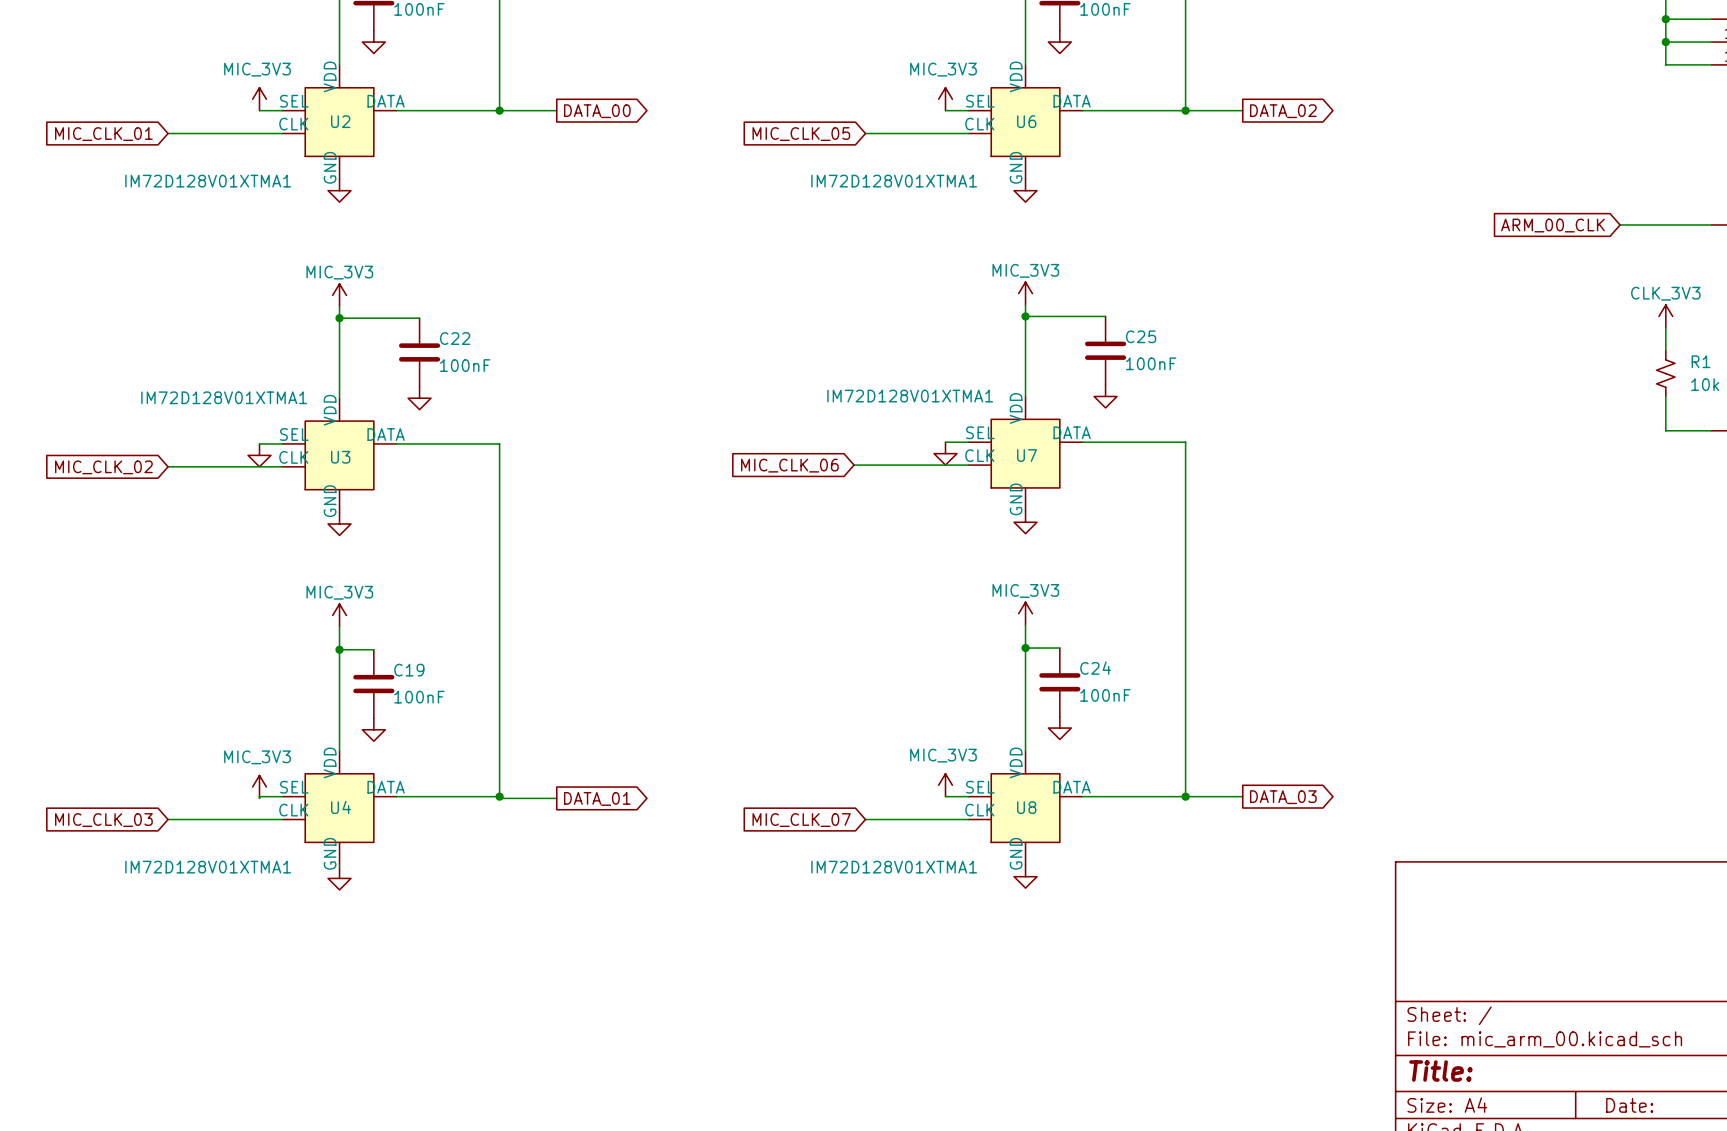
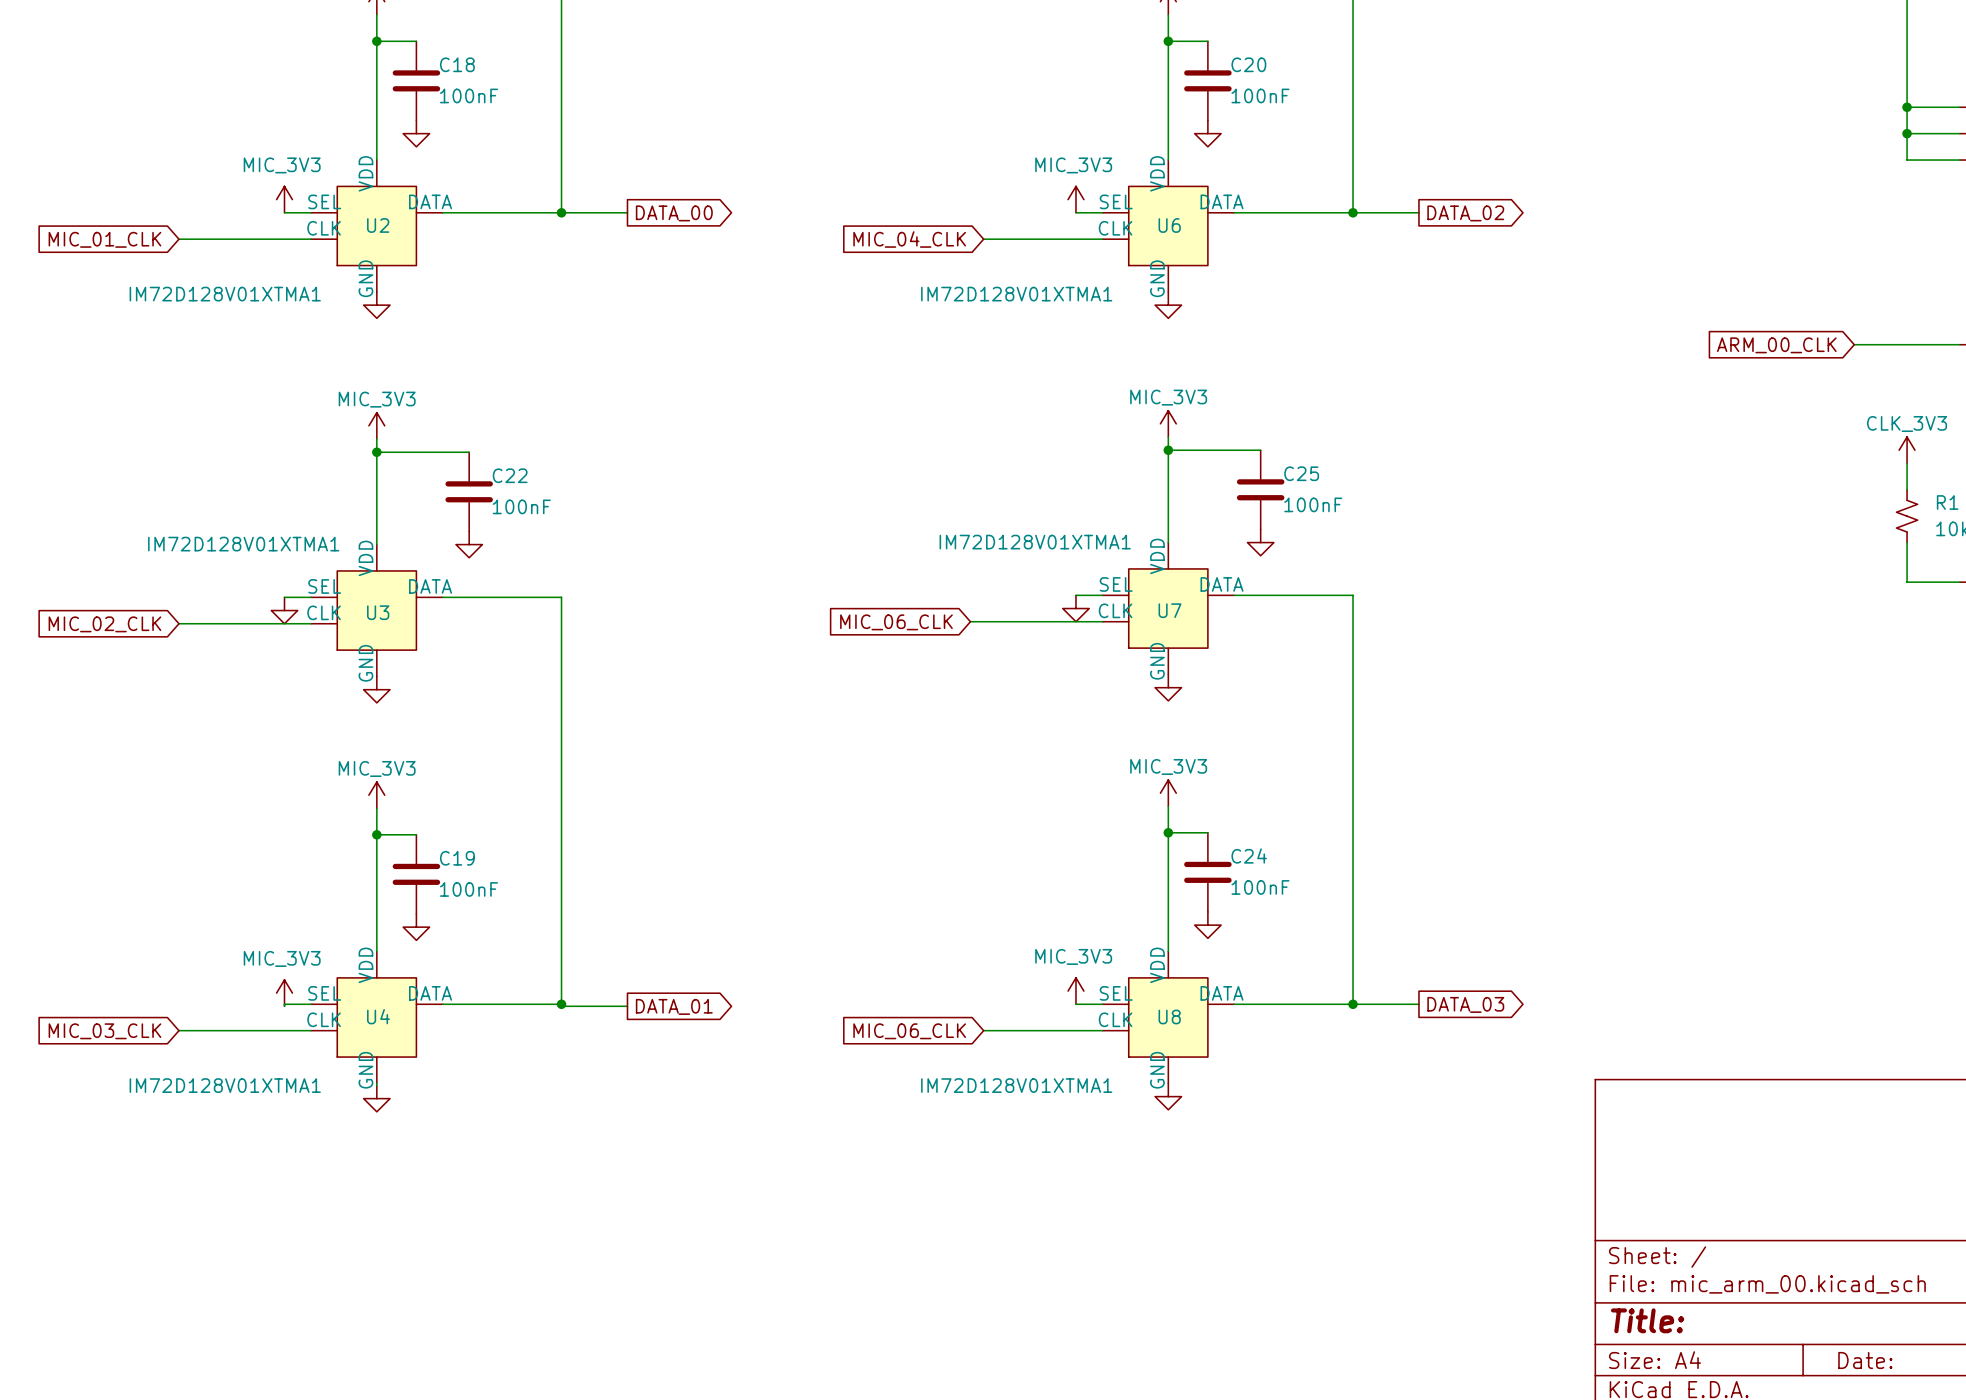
global label: MIC_CLK_01 (103, 134) -> MIC_01_CLK (104, 239)
global label: MIC_CLK_05 (801, 134) -> MIC_04_CLK (909, 239)
global label: MIC_CLK_06 (789, 465) -> MIC_06_CLK (896, 622)
global label: MIC_CLK_02 (103, 467) -> MIC_02_CLK (104, 624)
global label: MIC_CLK_03 (103, 820) -> MIC_03_CLK (104, 1031)
global label: MIC_CLK_07 (801, 820) -> MIC_06_CLK (909, 1031)

